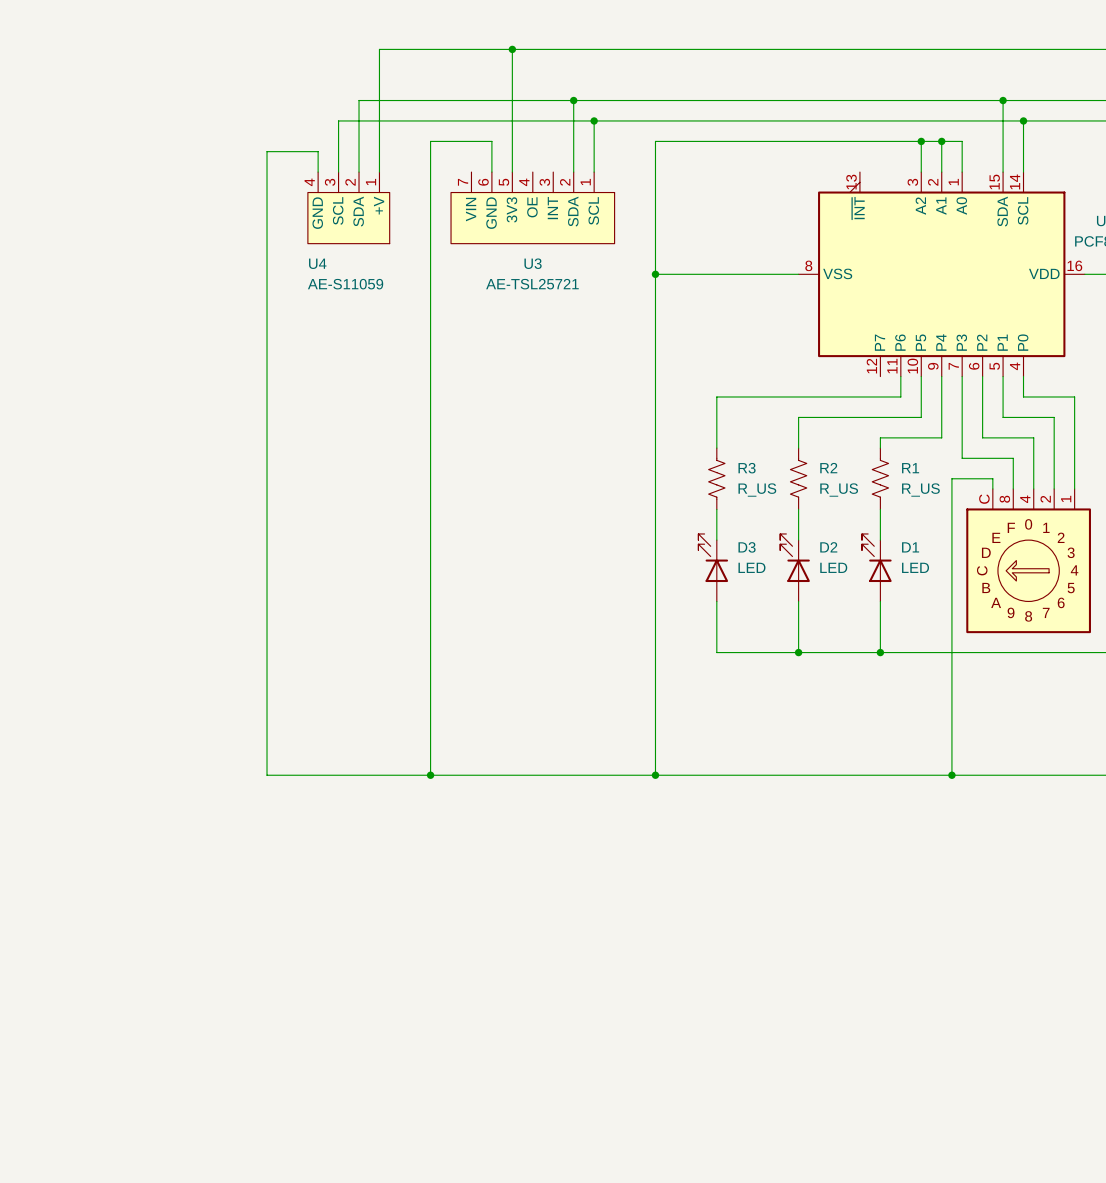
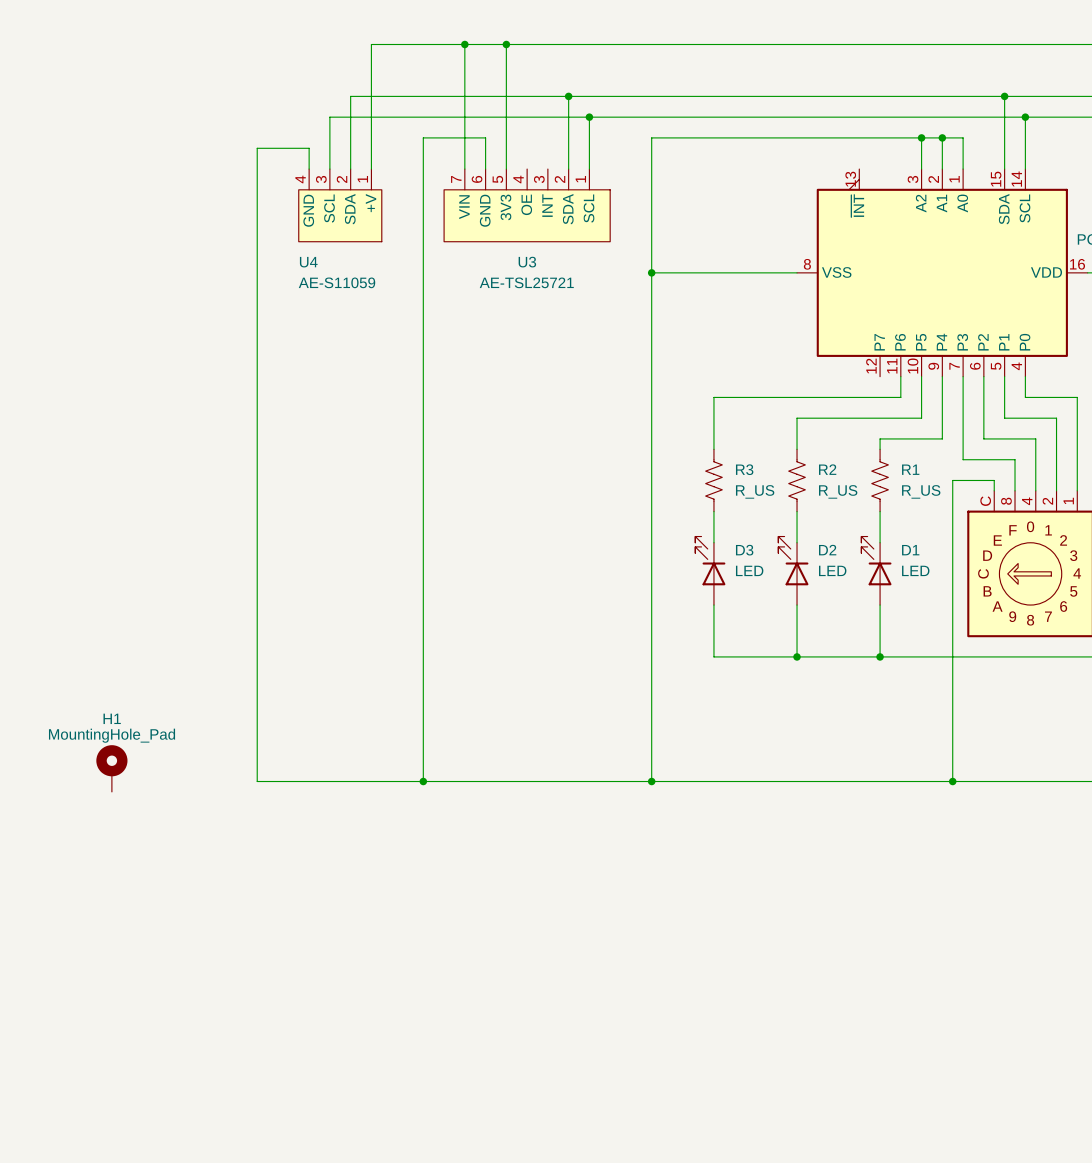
wire: none -> (464, 44) (464, 169)
junction: none -> (464, 44)
H1: none -> MountingHole_Pad (111, 768)

